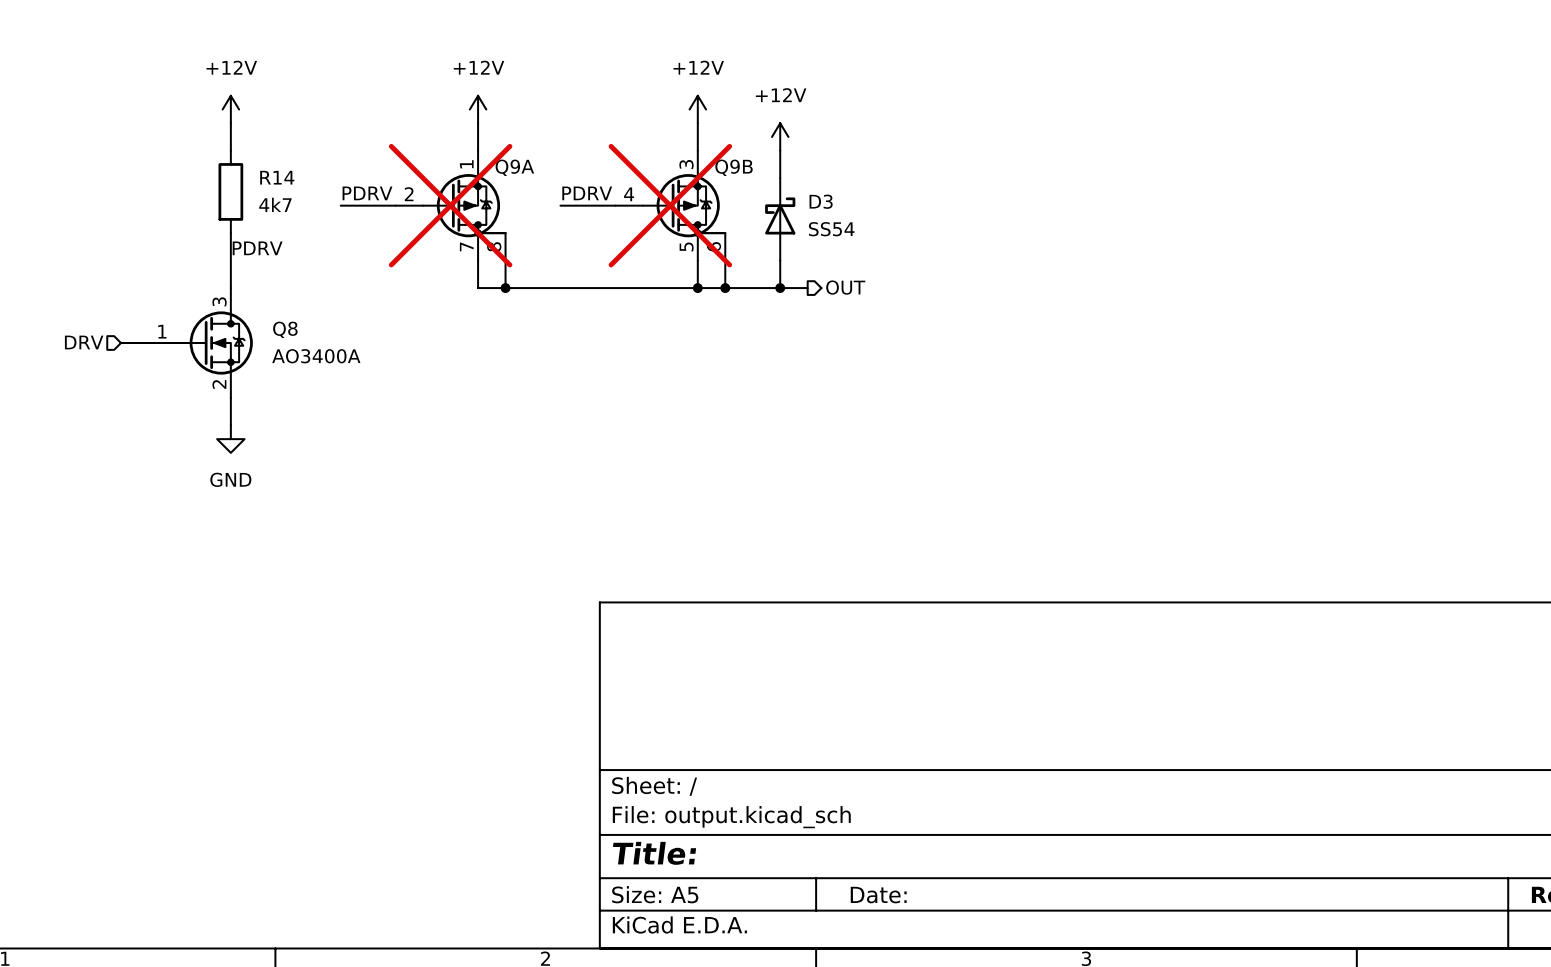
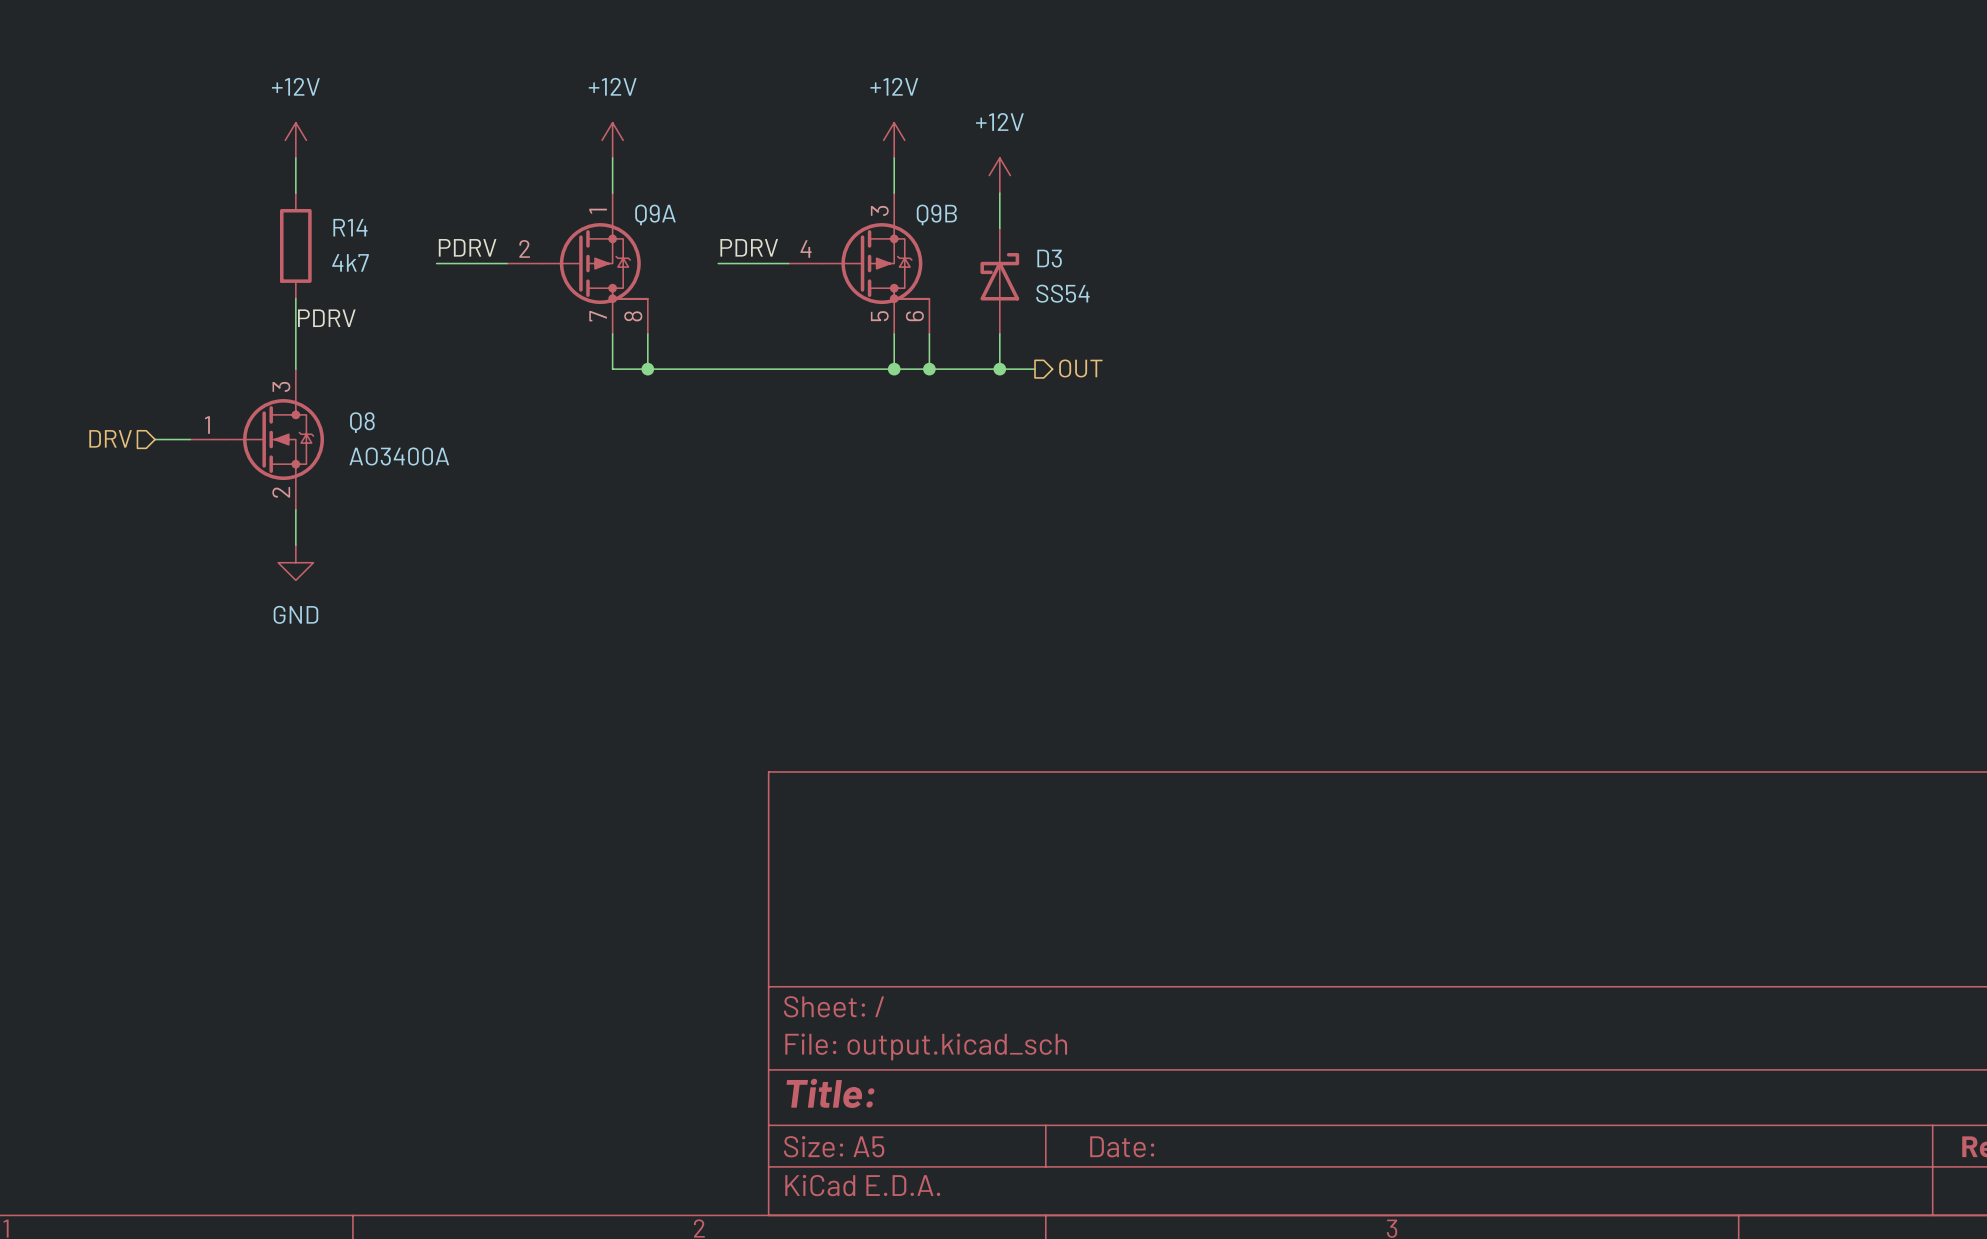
Q9A do-not-place cross: (450, 205) -> none
Q9B do-not-place cross: (670, 205) -> none

